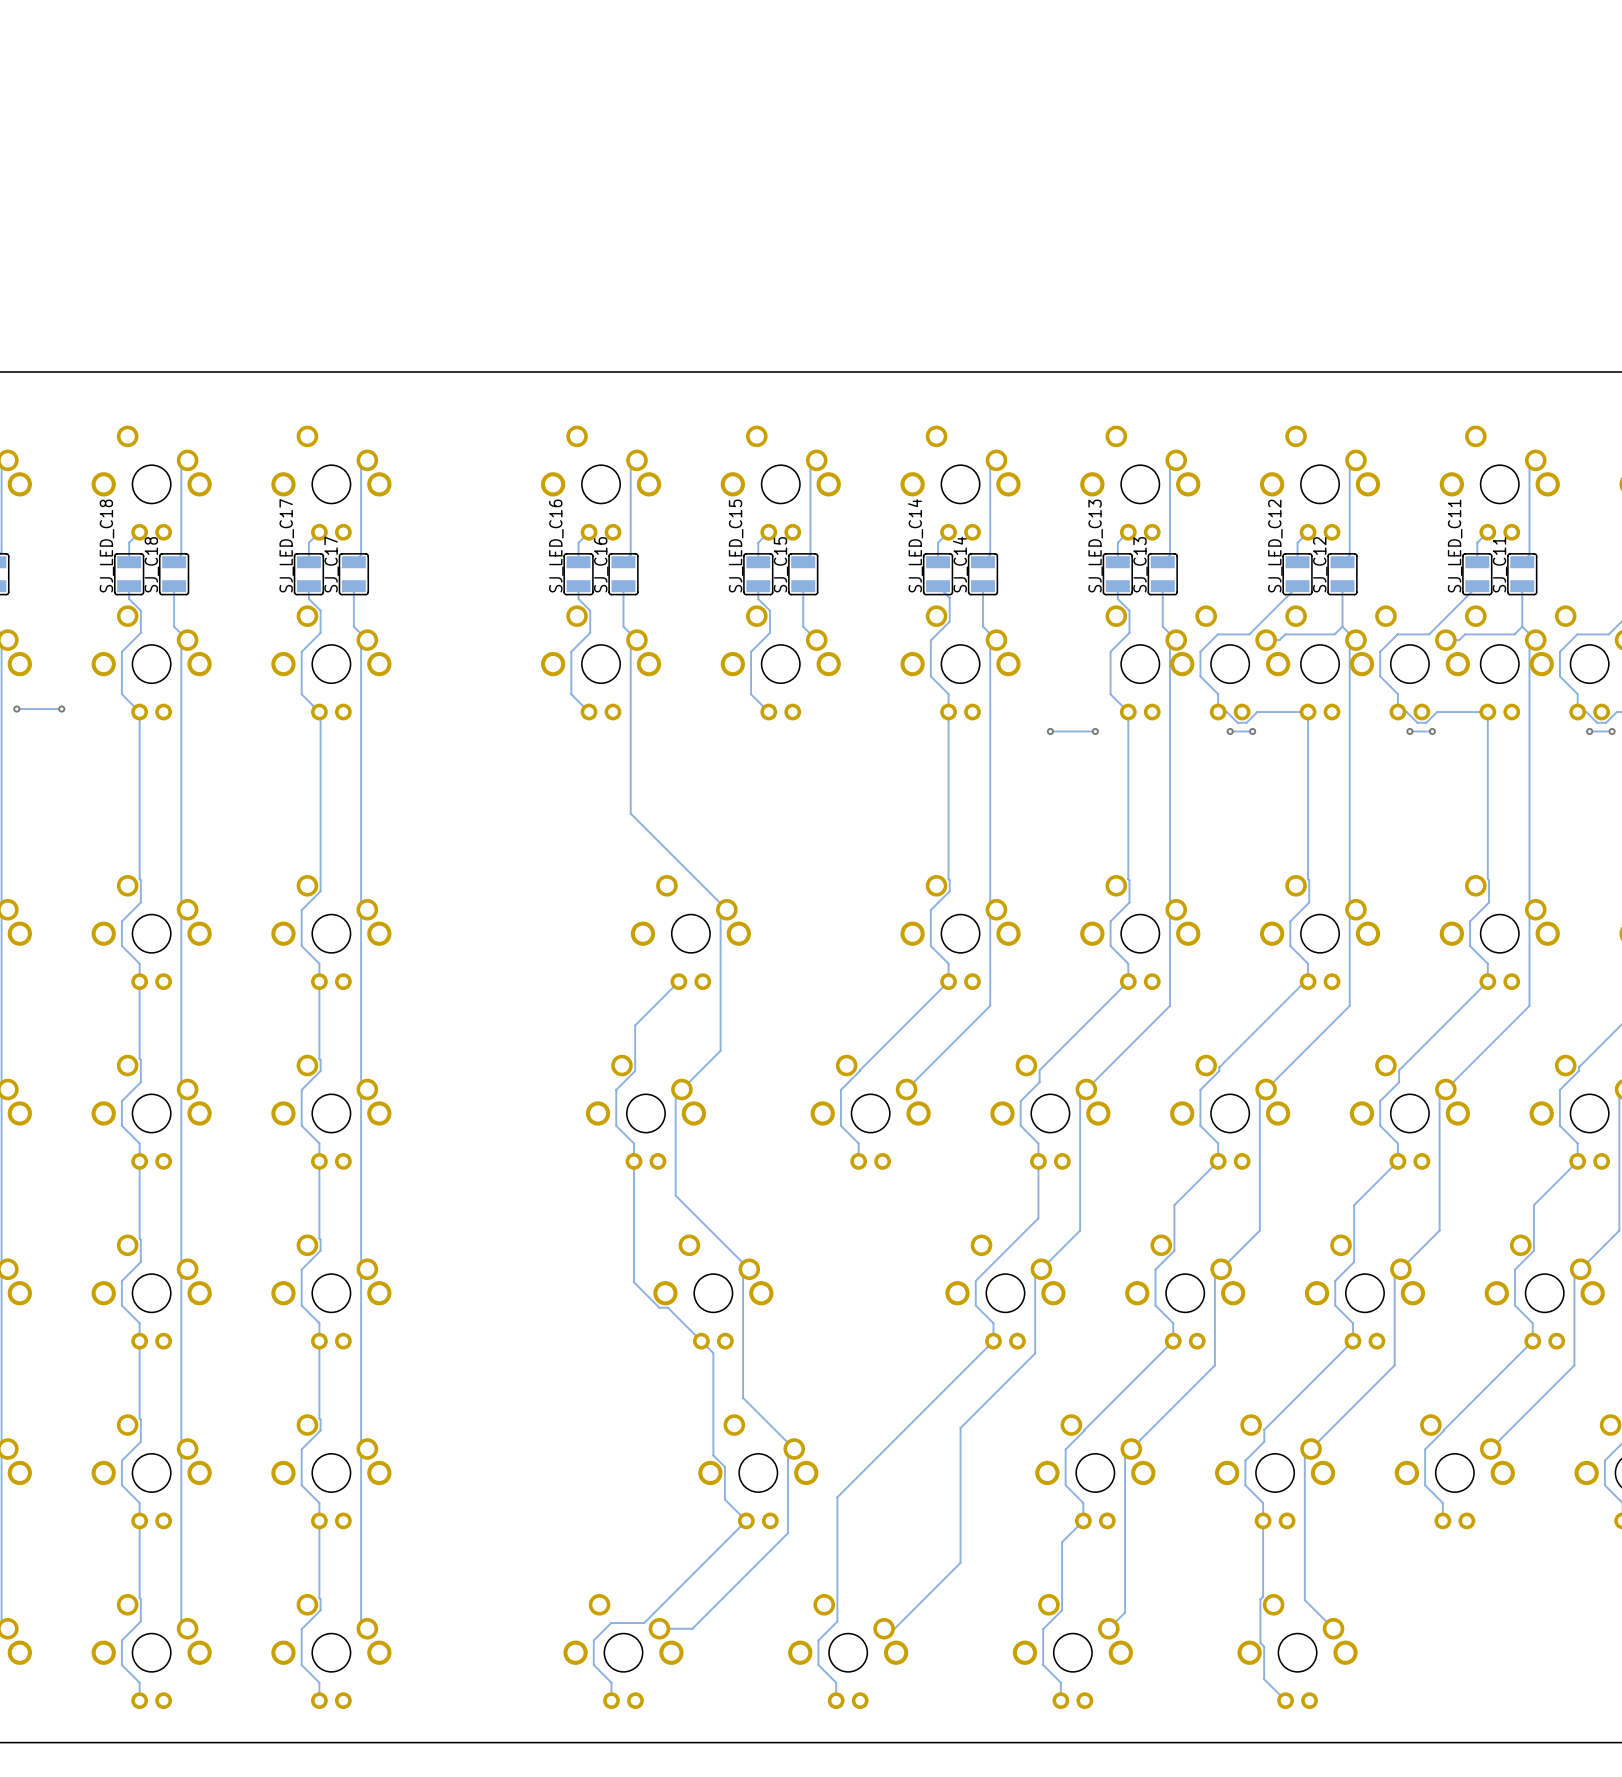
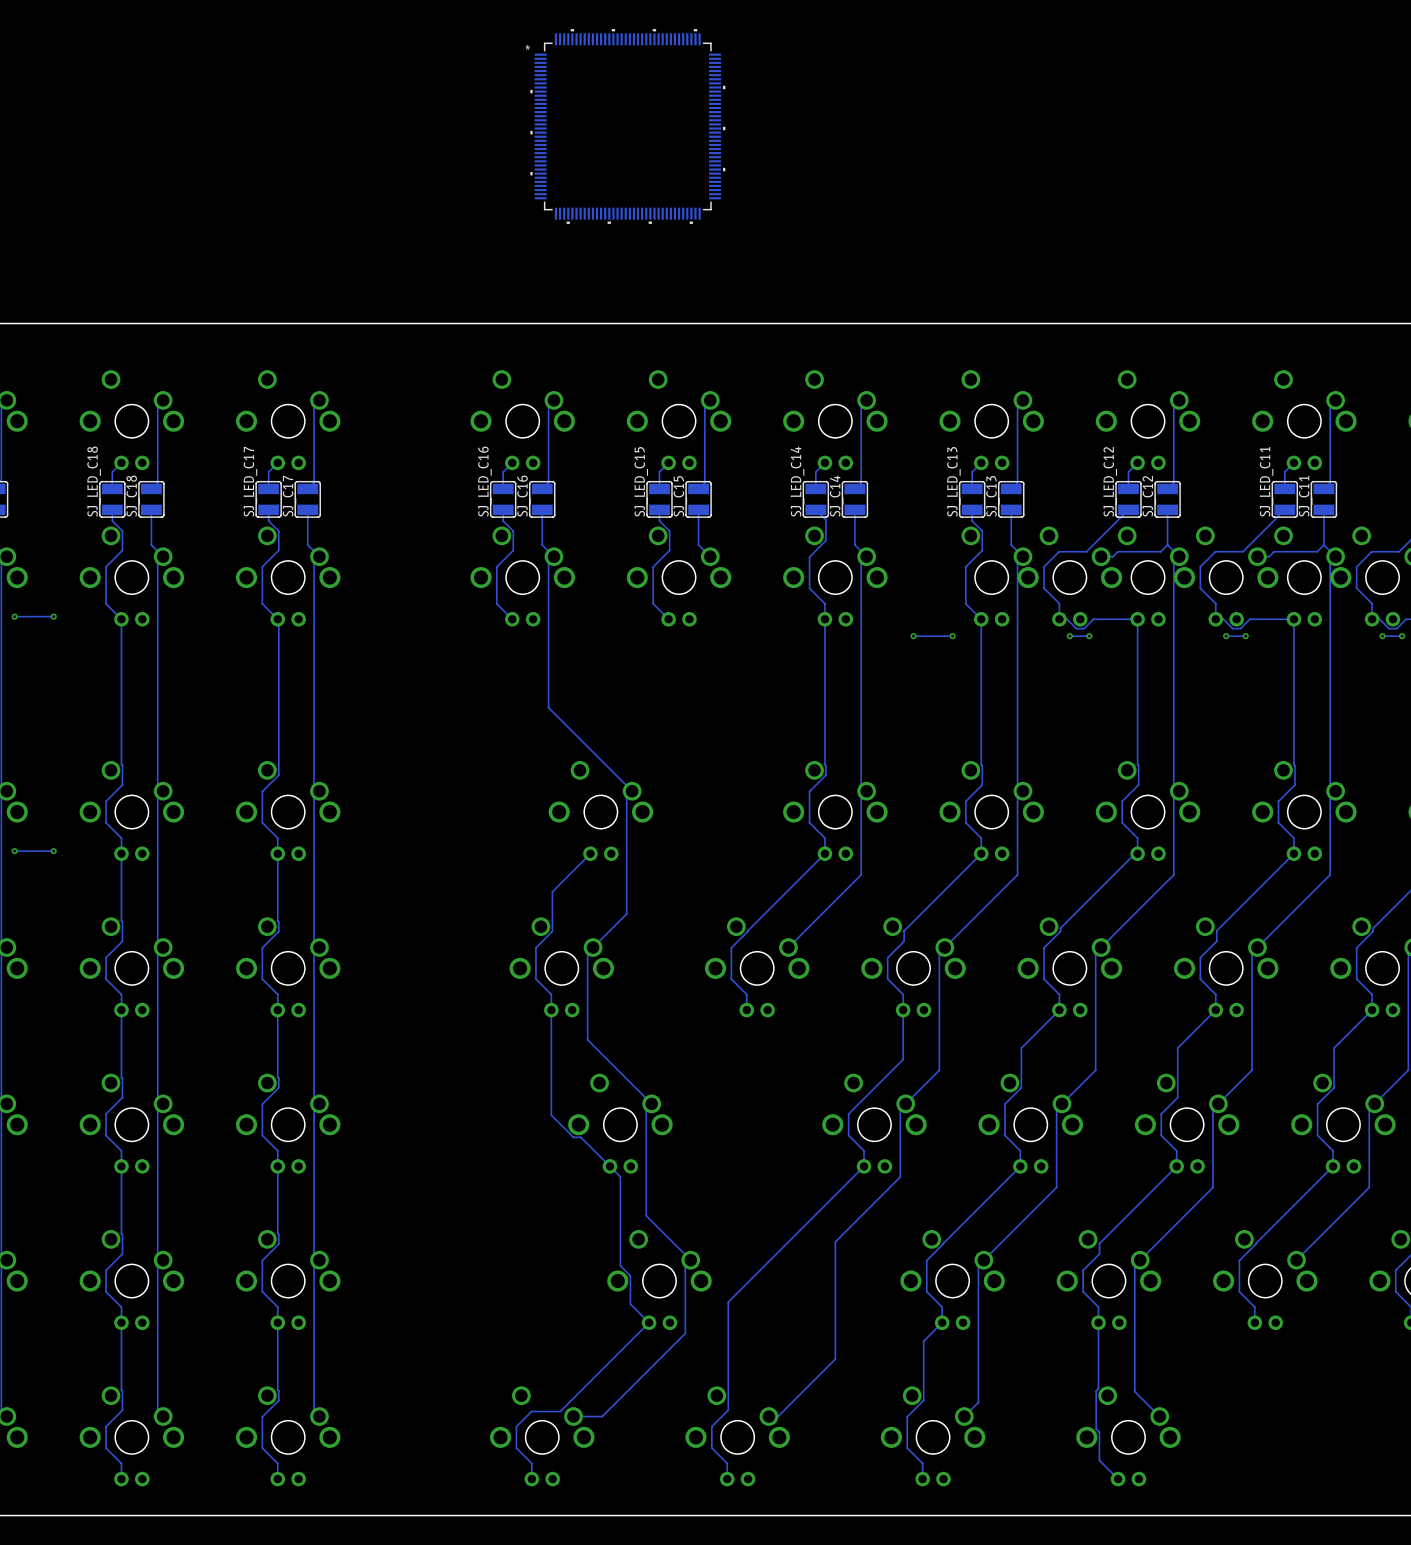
part: none -> (627, 126)
via: none -> (14, 851)
track: none -> (53, 851) (14, 851)
via: none -> (53, 851)

